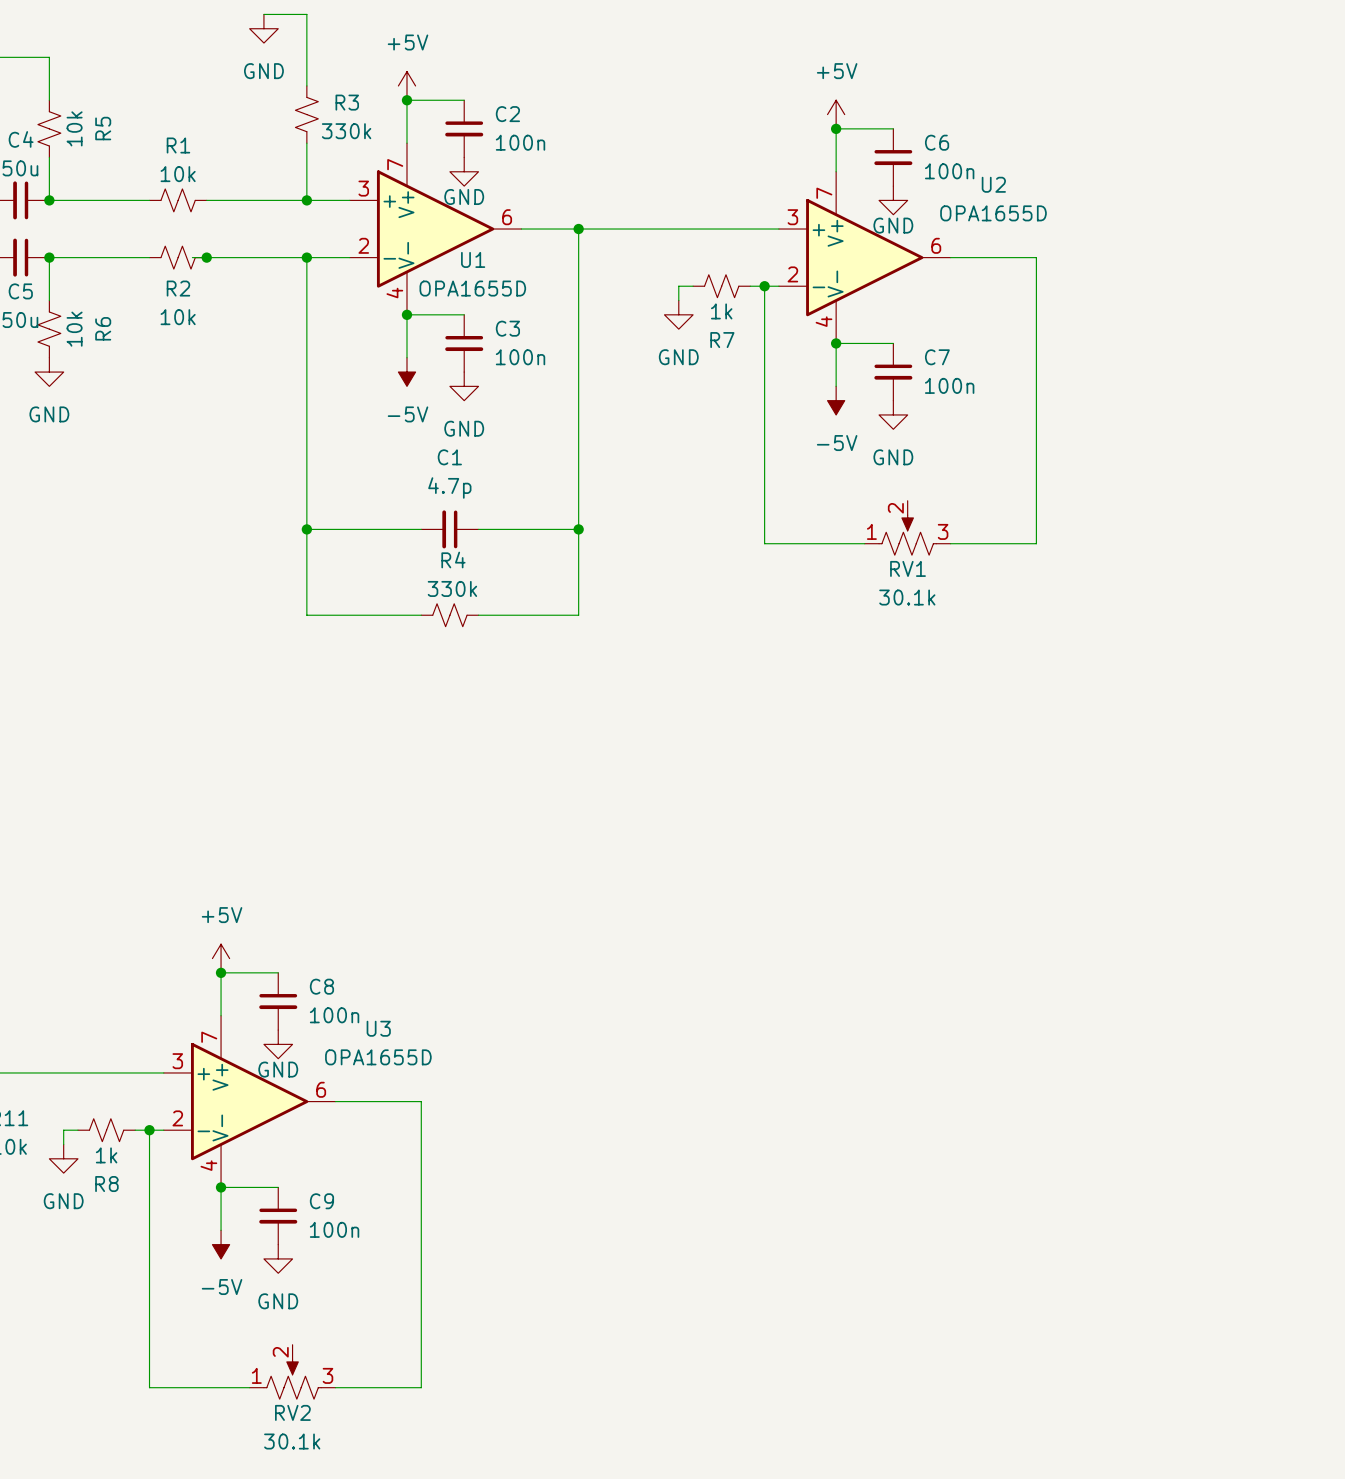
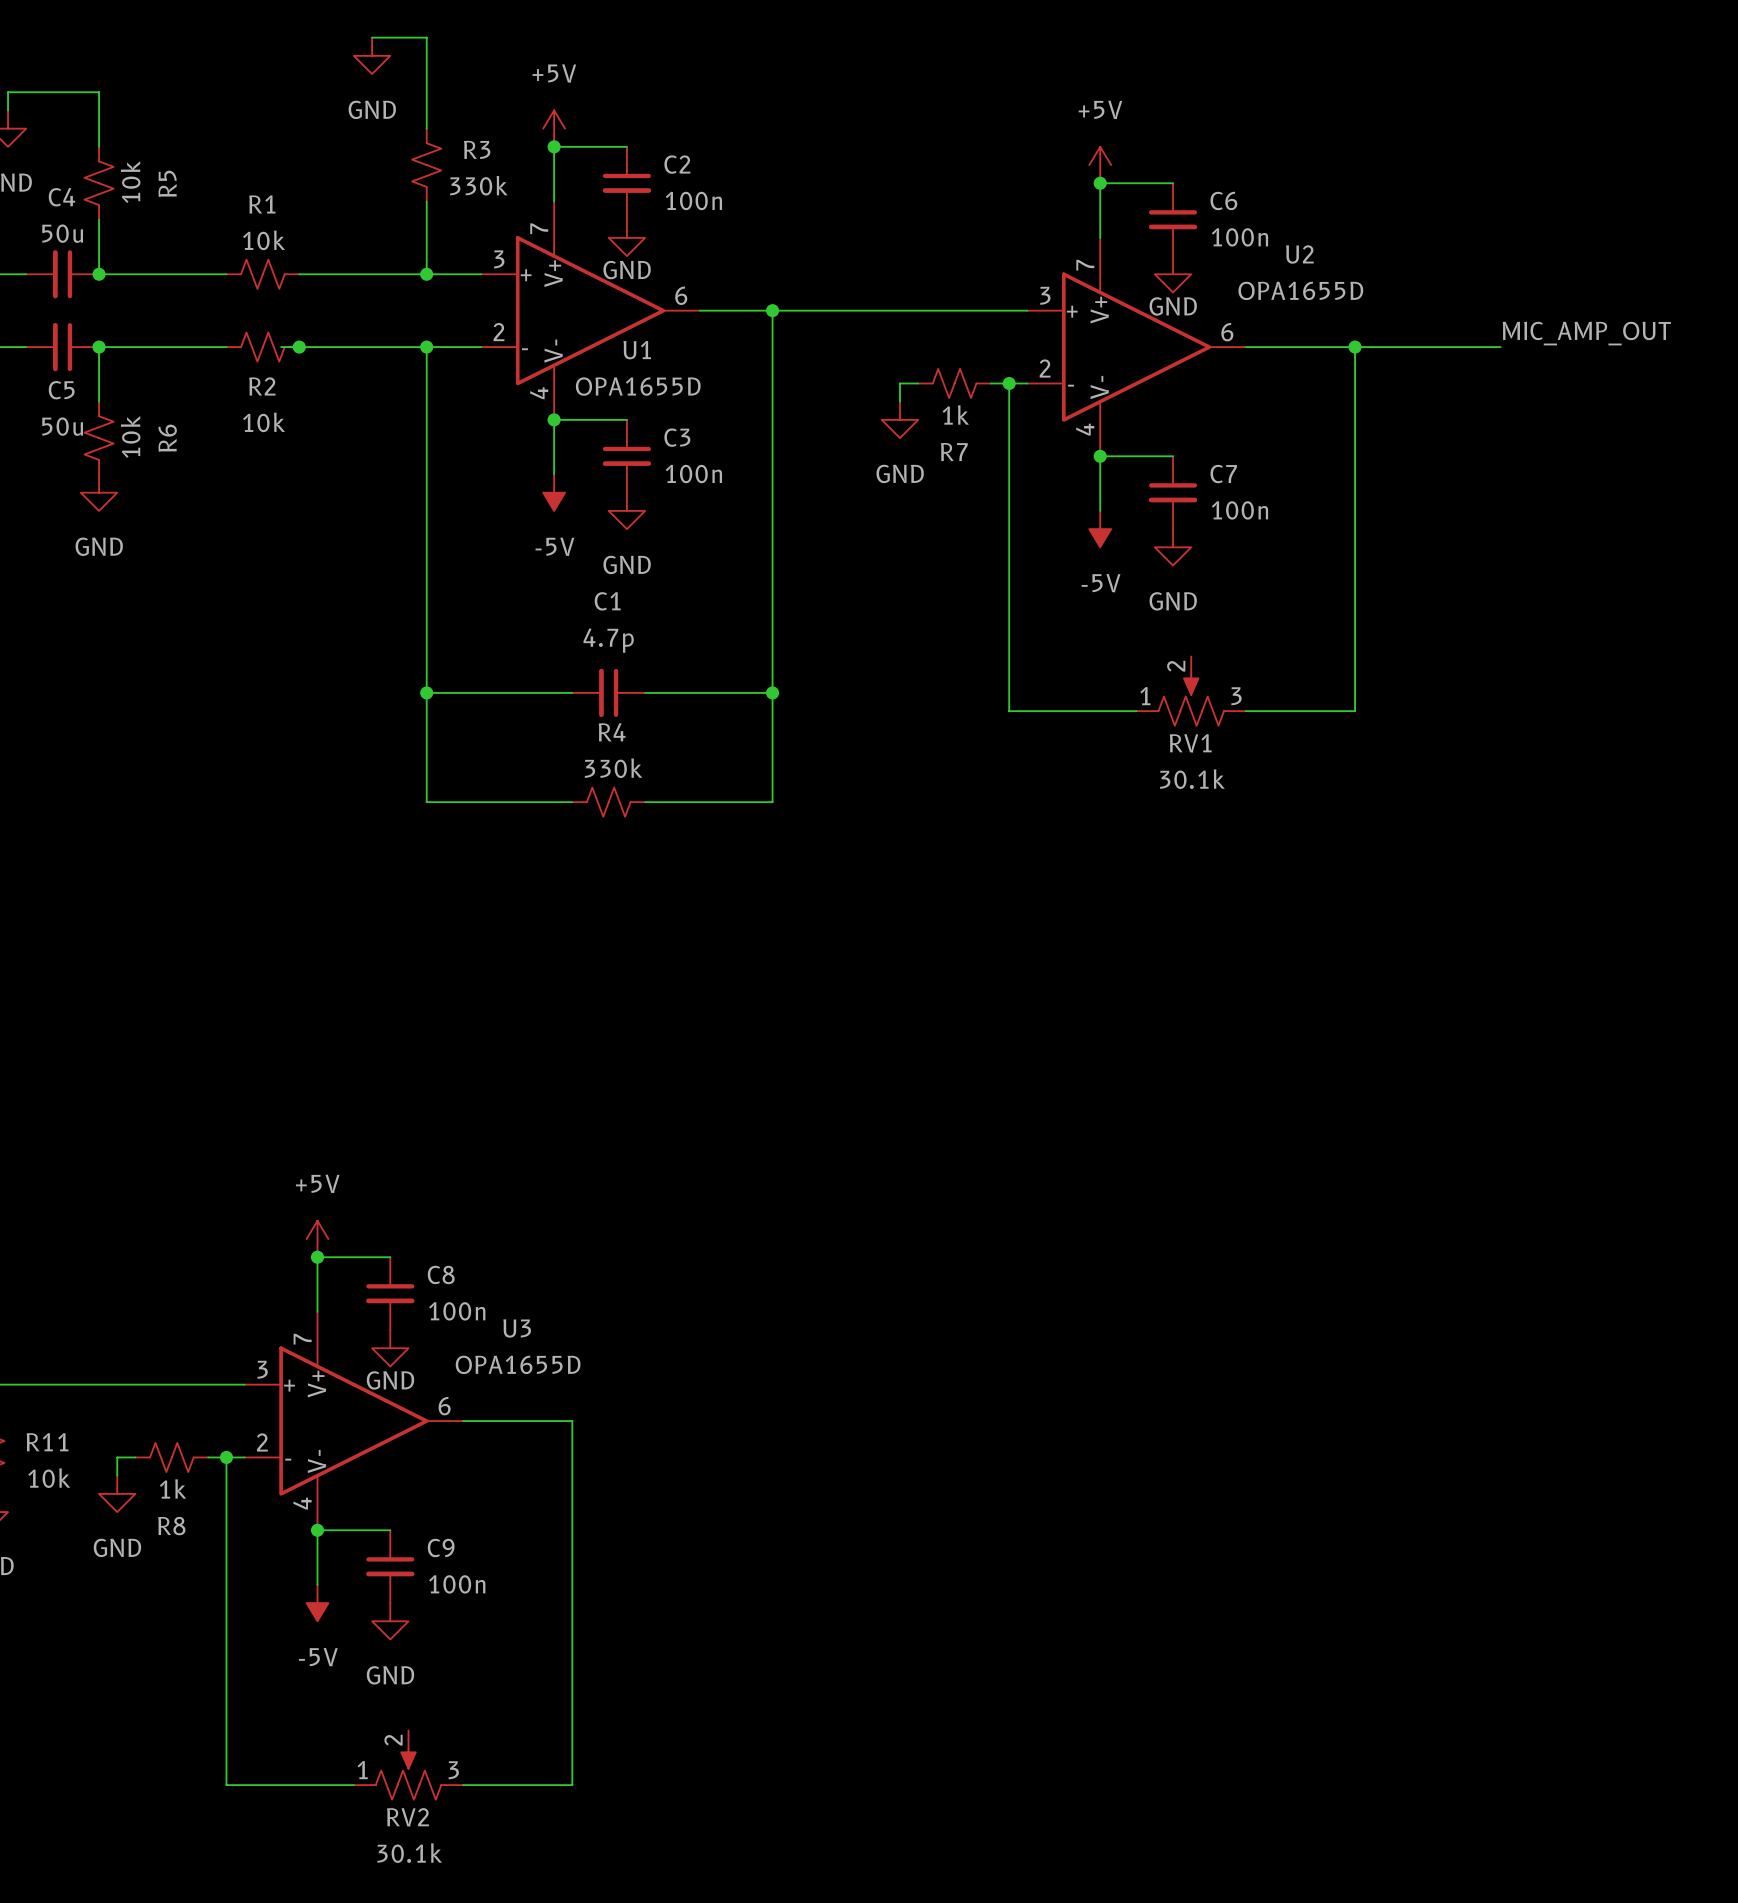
label: none -> MIC_AMP_OUT (1586, 333)
wire: none -> (1355, 347) (1500, 347)
junction: none -> (1355, 347)

